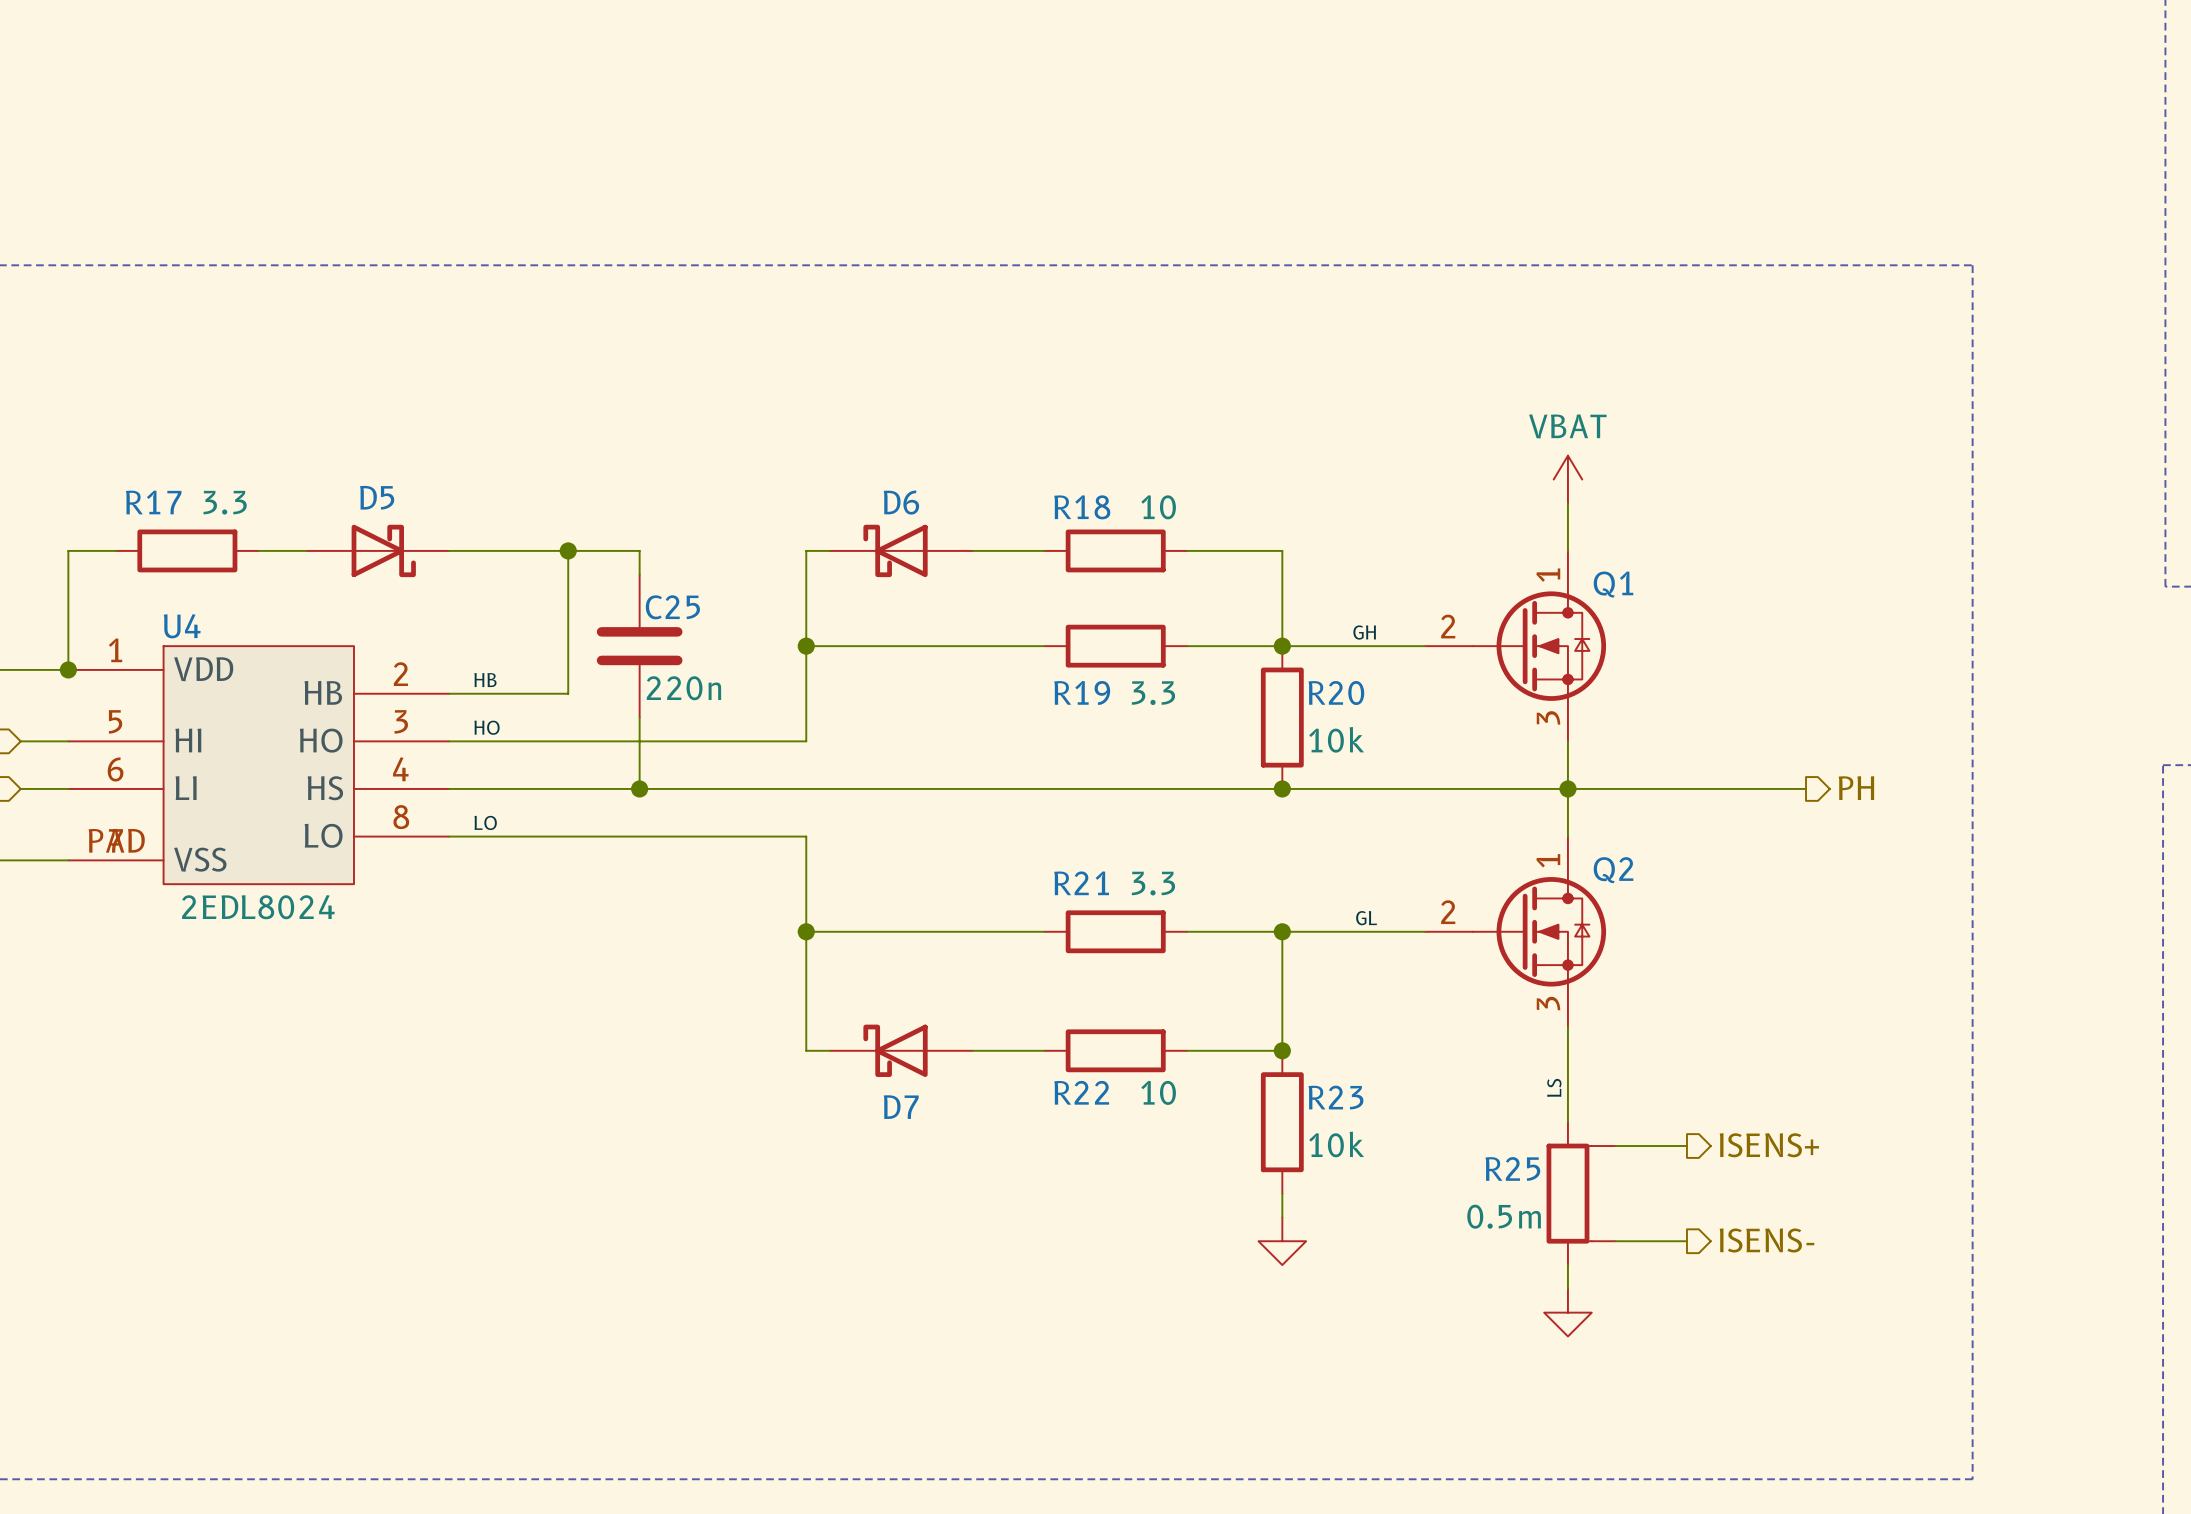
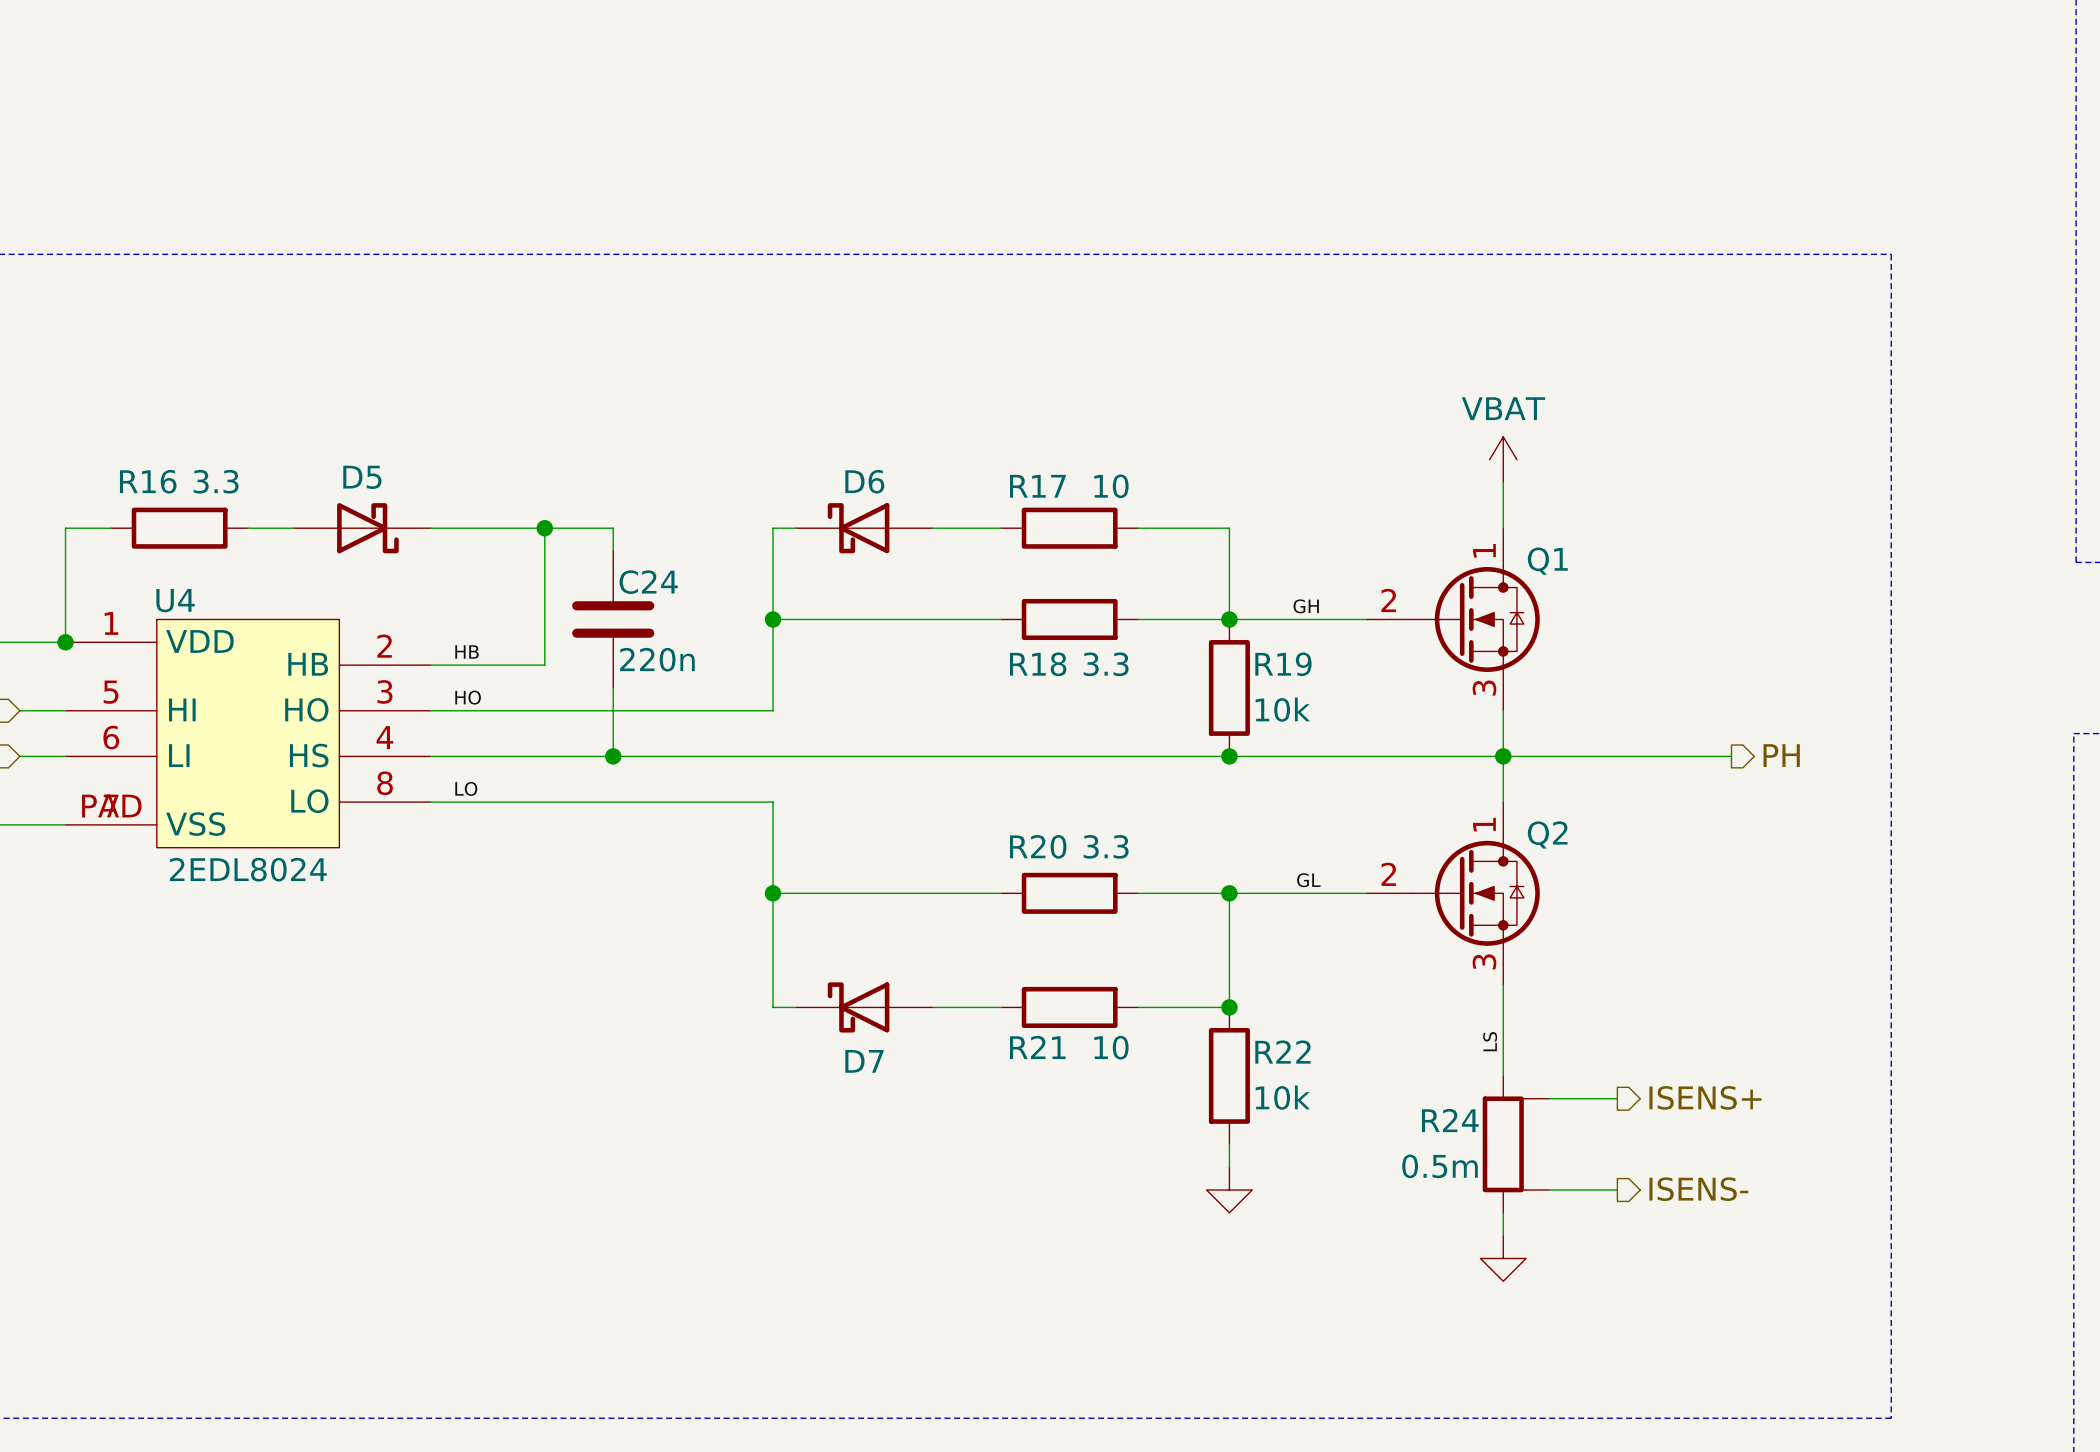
R17 name: R17 (153, 502) -> R16 (148, 481)
R18 name: R18 (1082, 507) -> R17 (1037, 486)
C25 name: C25 (672, 607) -> C24 (648, 582)
R19 name: R19 (1082, 692) -> R18 (1038, 664)
R20 name: R20 (1336, 693) -> R19 (1283, 664)
R21 name: R21 (1081, 883) -> R20 (1038, 846)
R22 name: R22 (1081, 1092) -> R21 (1037, 1047)
R23 name: R23 (1335, 1097) -> R22 (1283, 1052)
R25 name: R25 (1512, 1168) -> R24 (1450, 1120)

